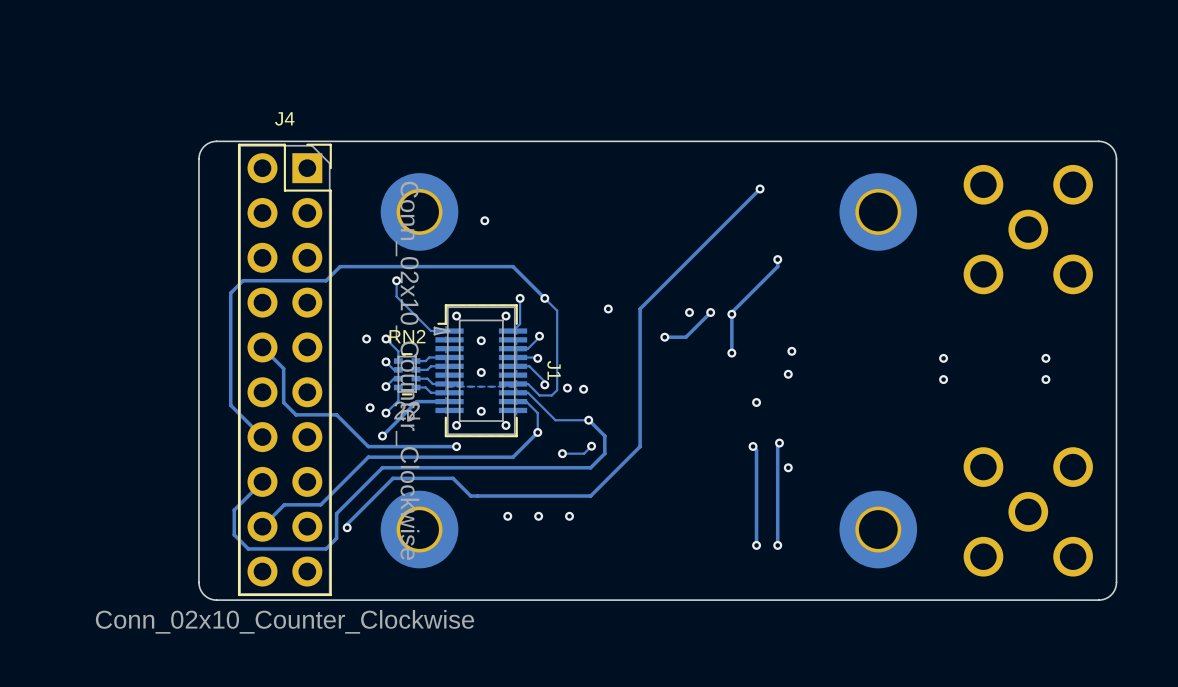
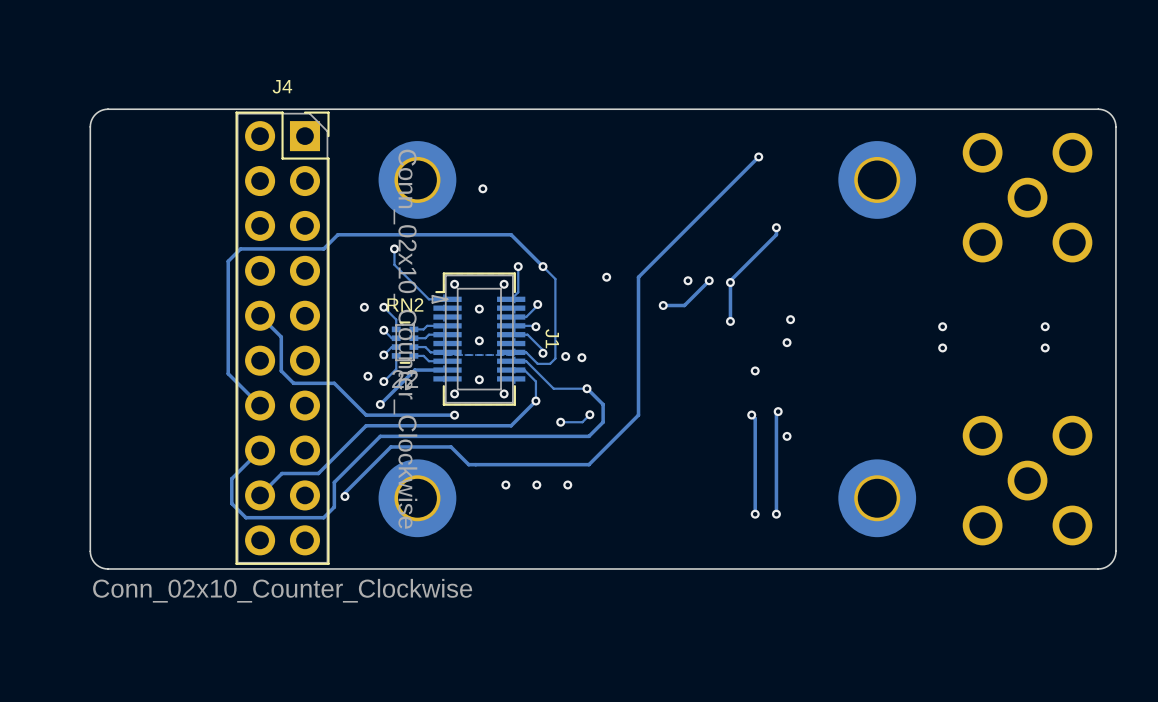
board edge: (216, 141) (204, 146) (198, 159) (198, 582) (204, 594) (216, 600) -> (214, 109) (105, 109) (93, 116) (90, 126) (90, 555) (95, 563) (105, 568) (214, 568)

